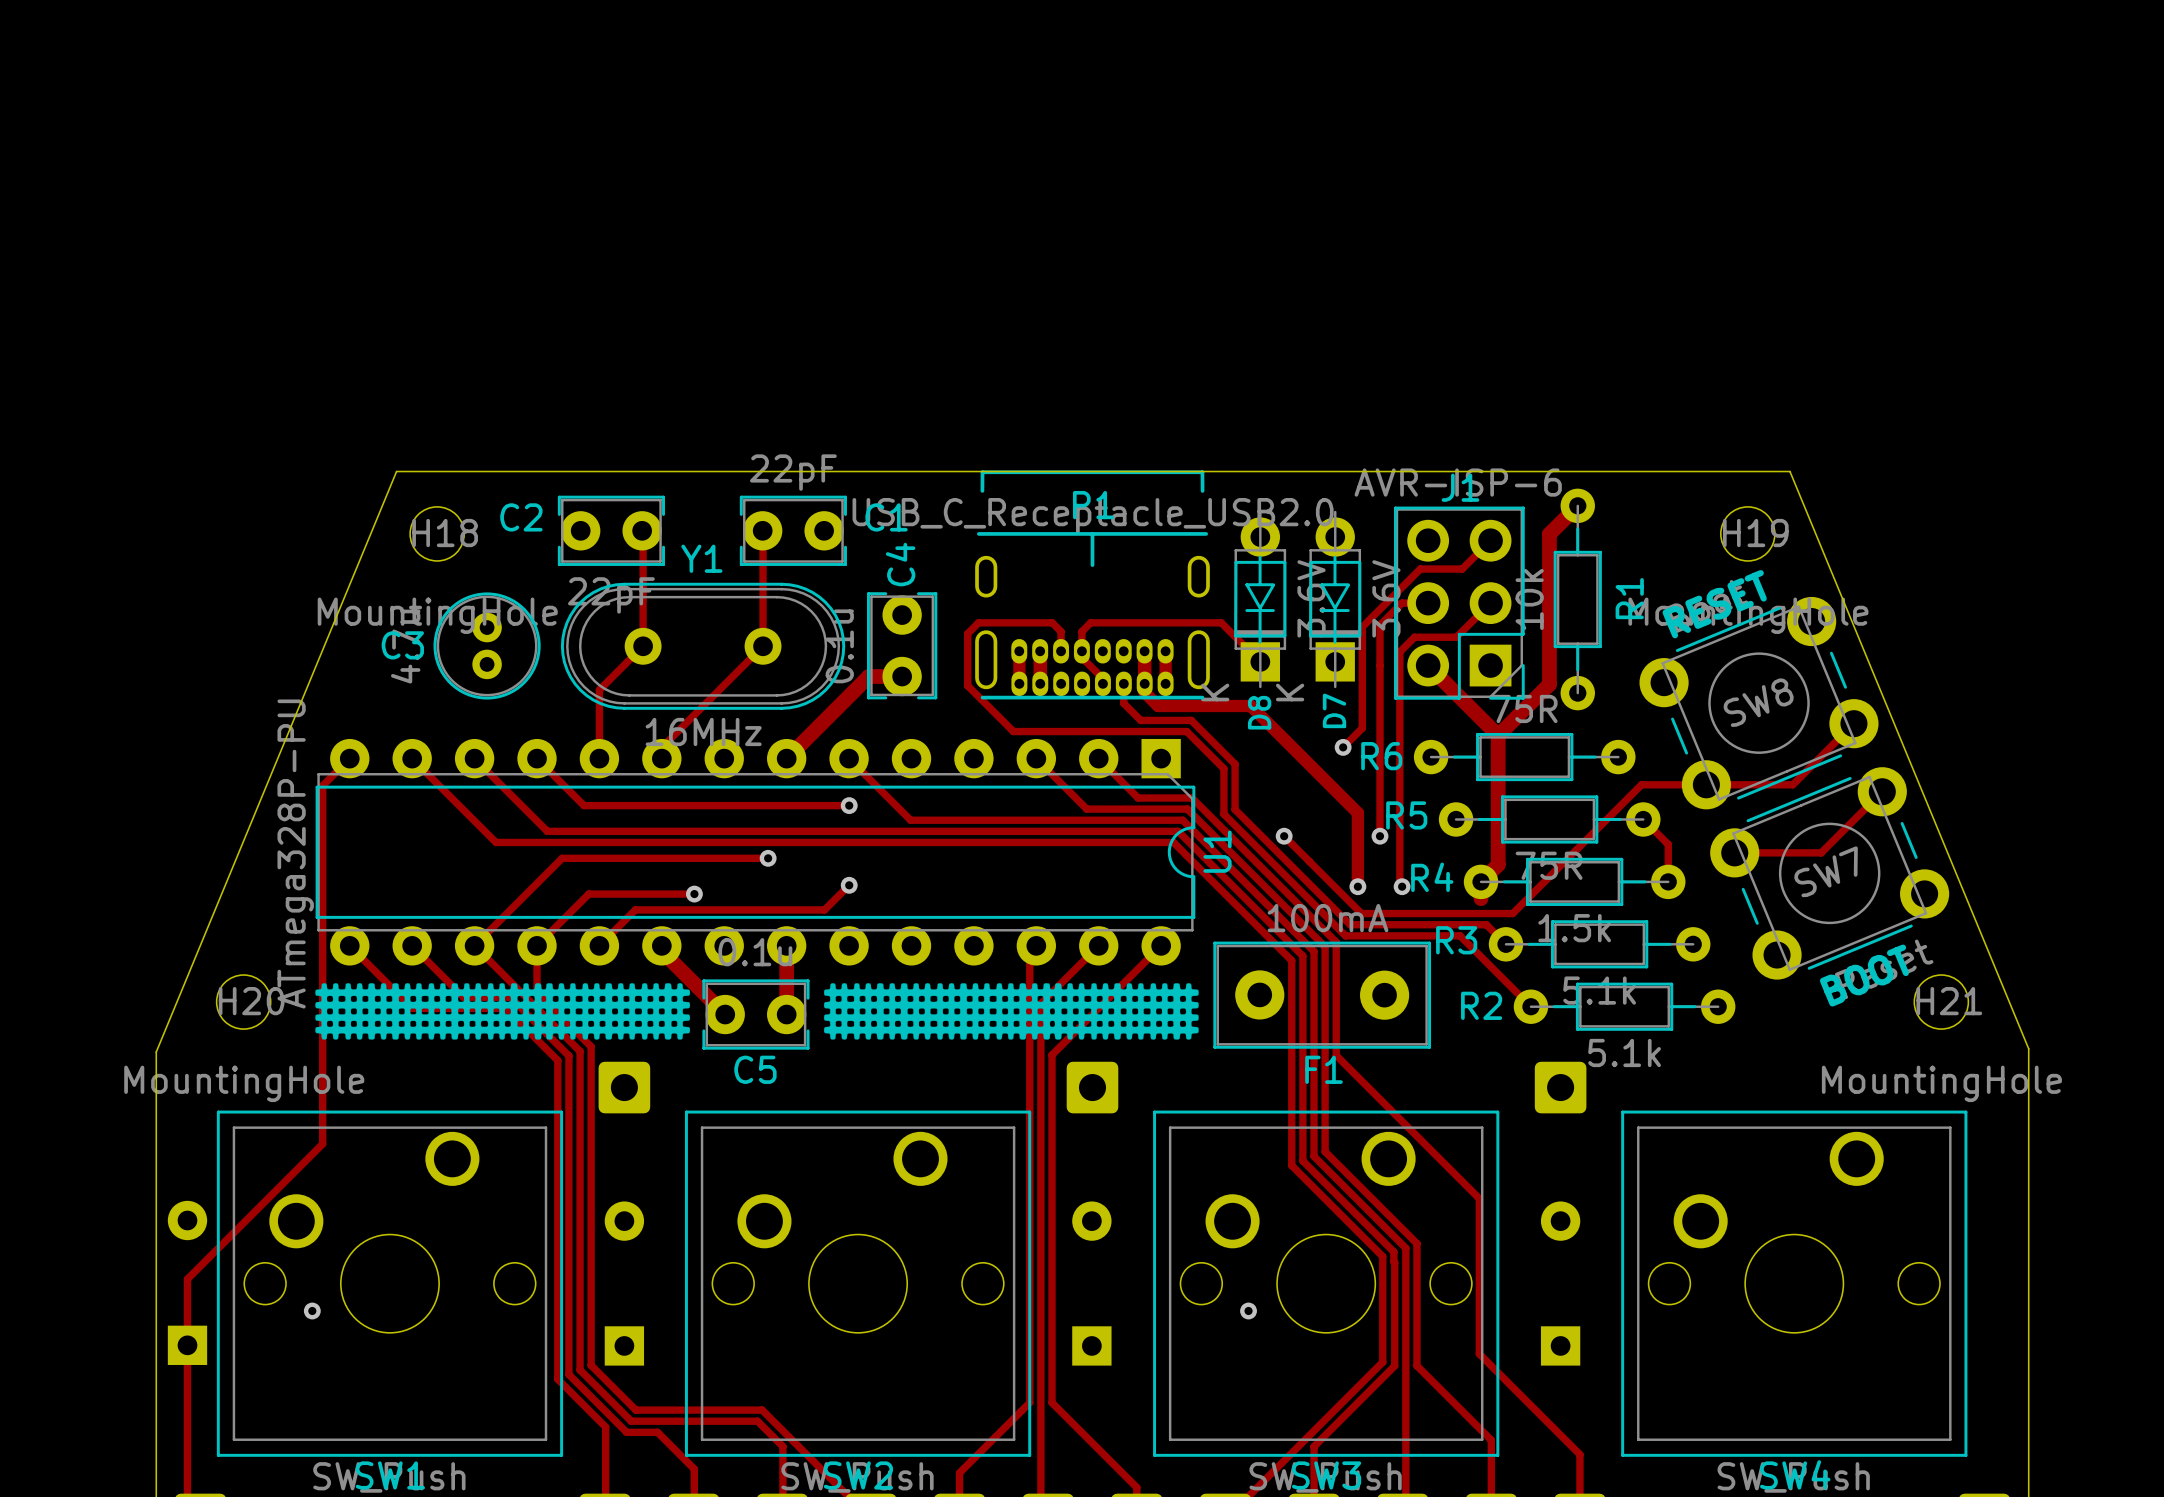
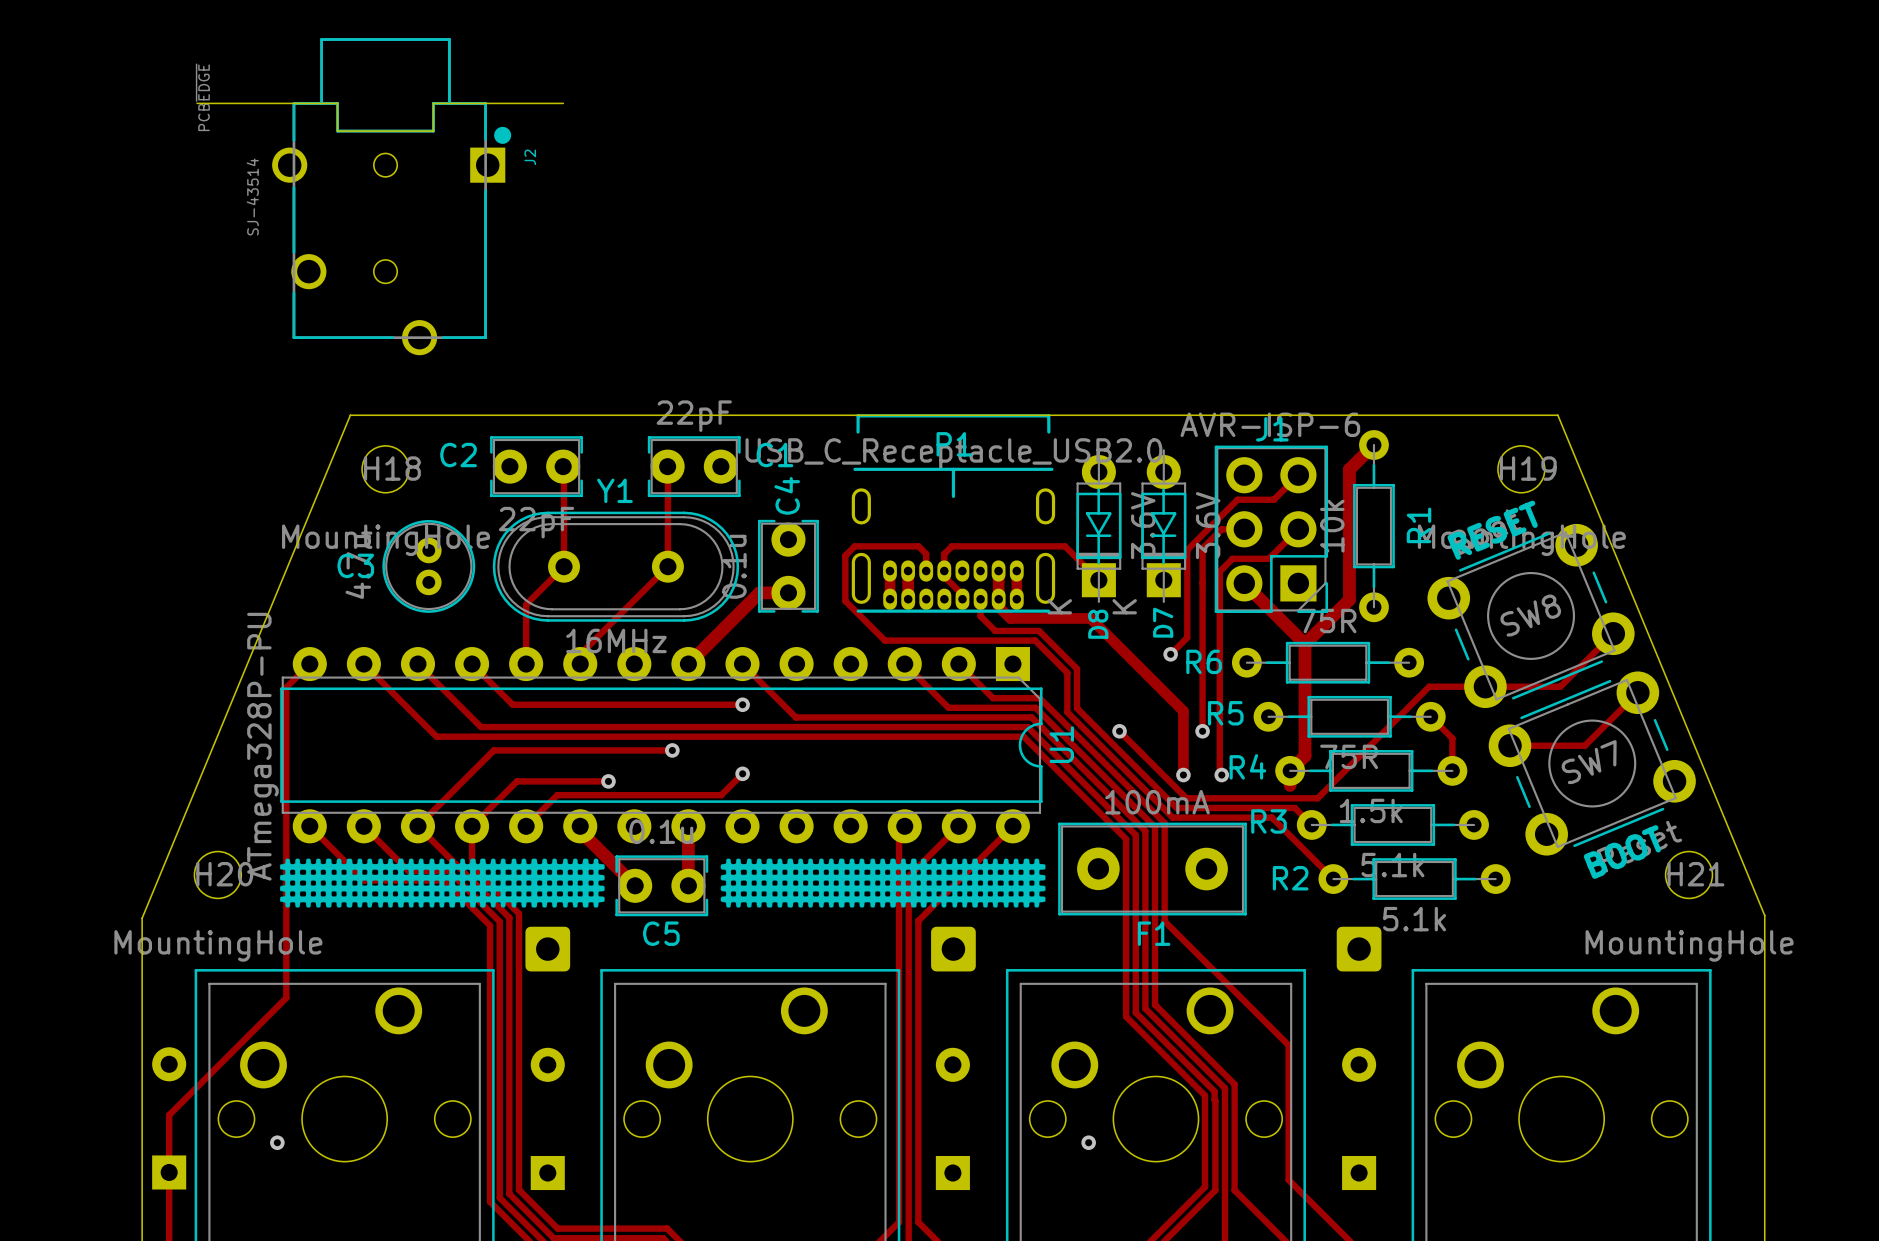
J2: none -> SJ-43514 (380, 196)

